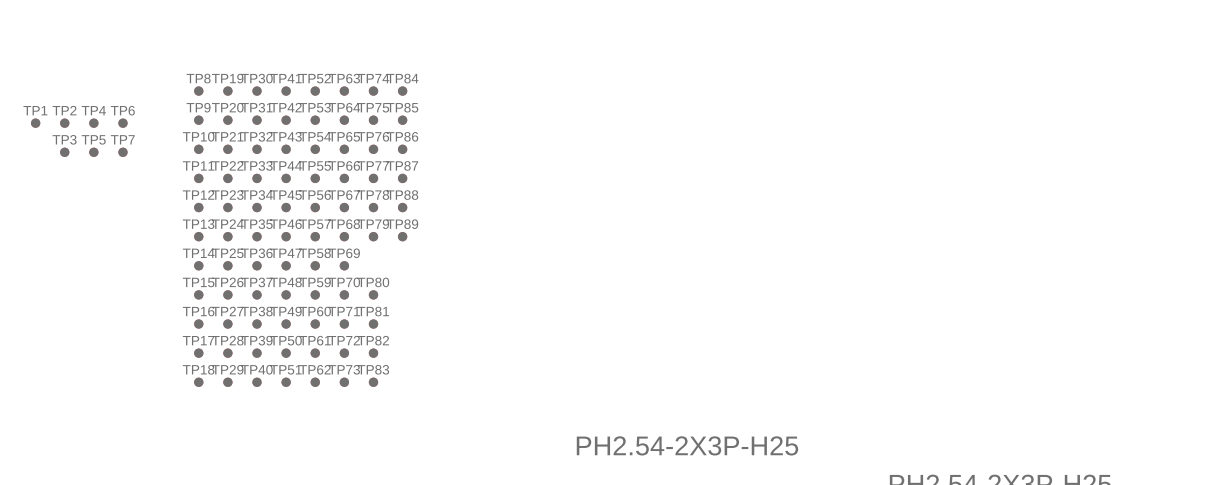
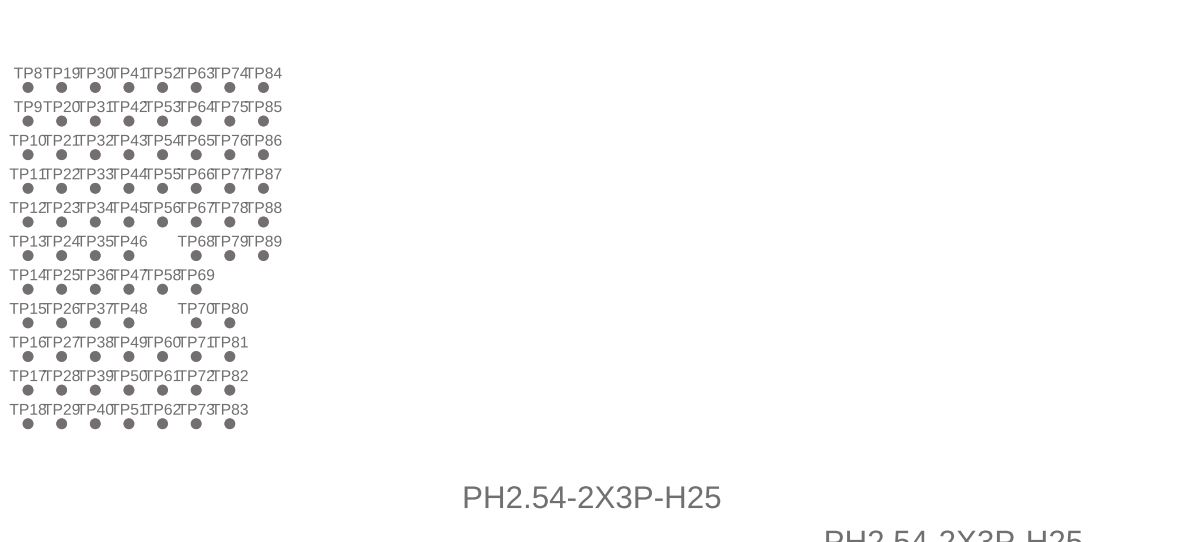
TP57: (315, 236) -> none
TP59: (315, 294) -> none

